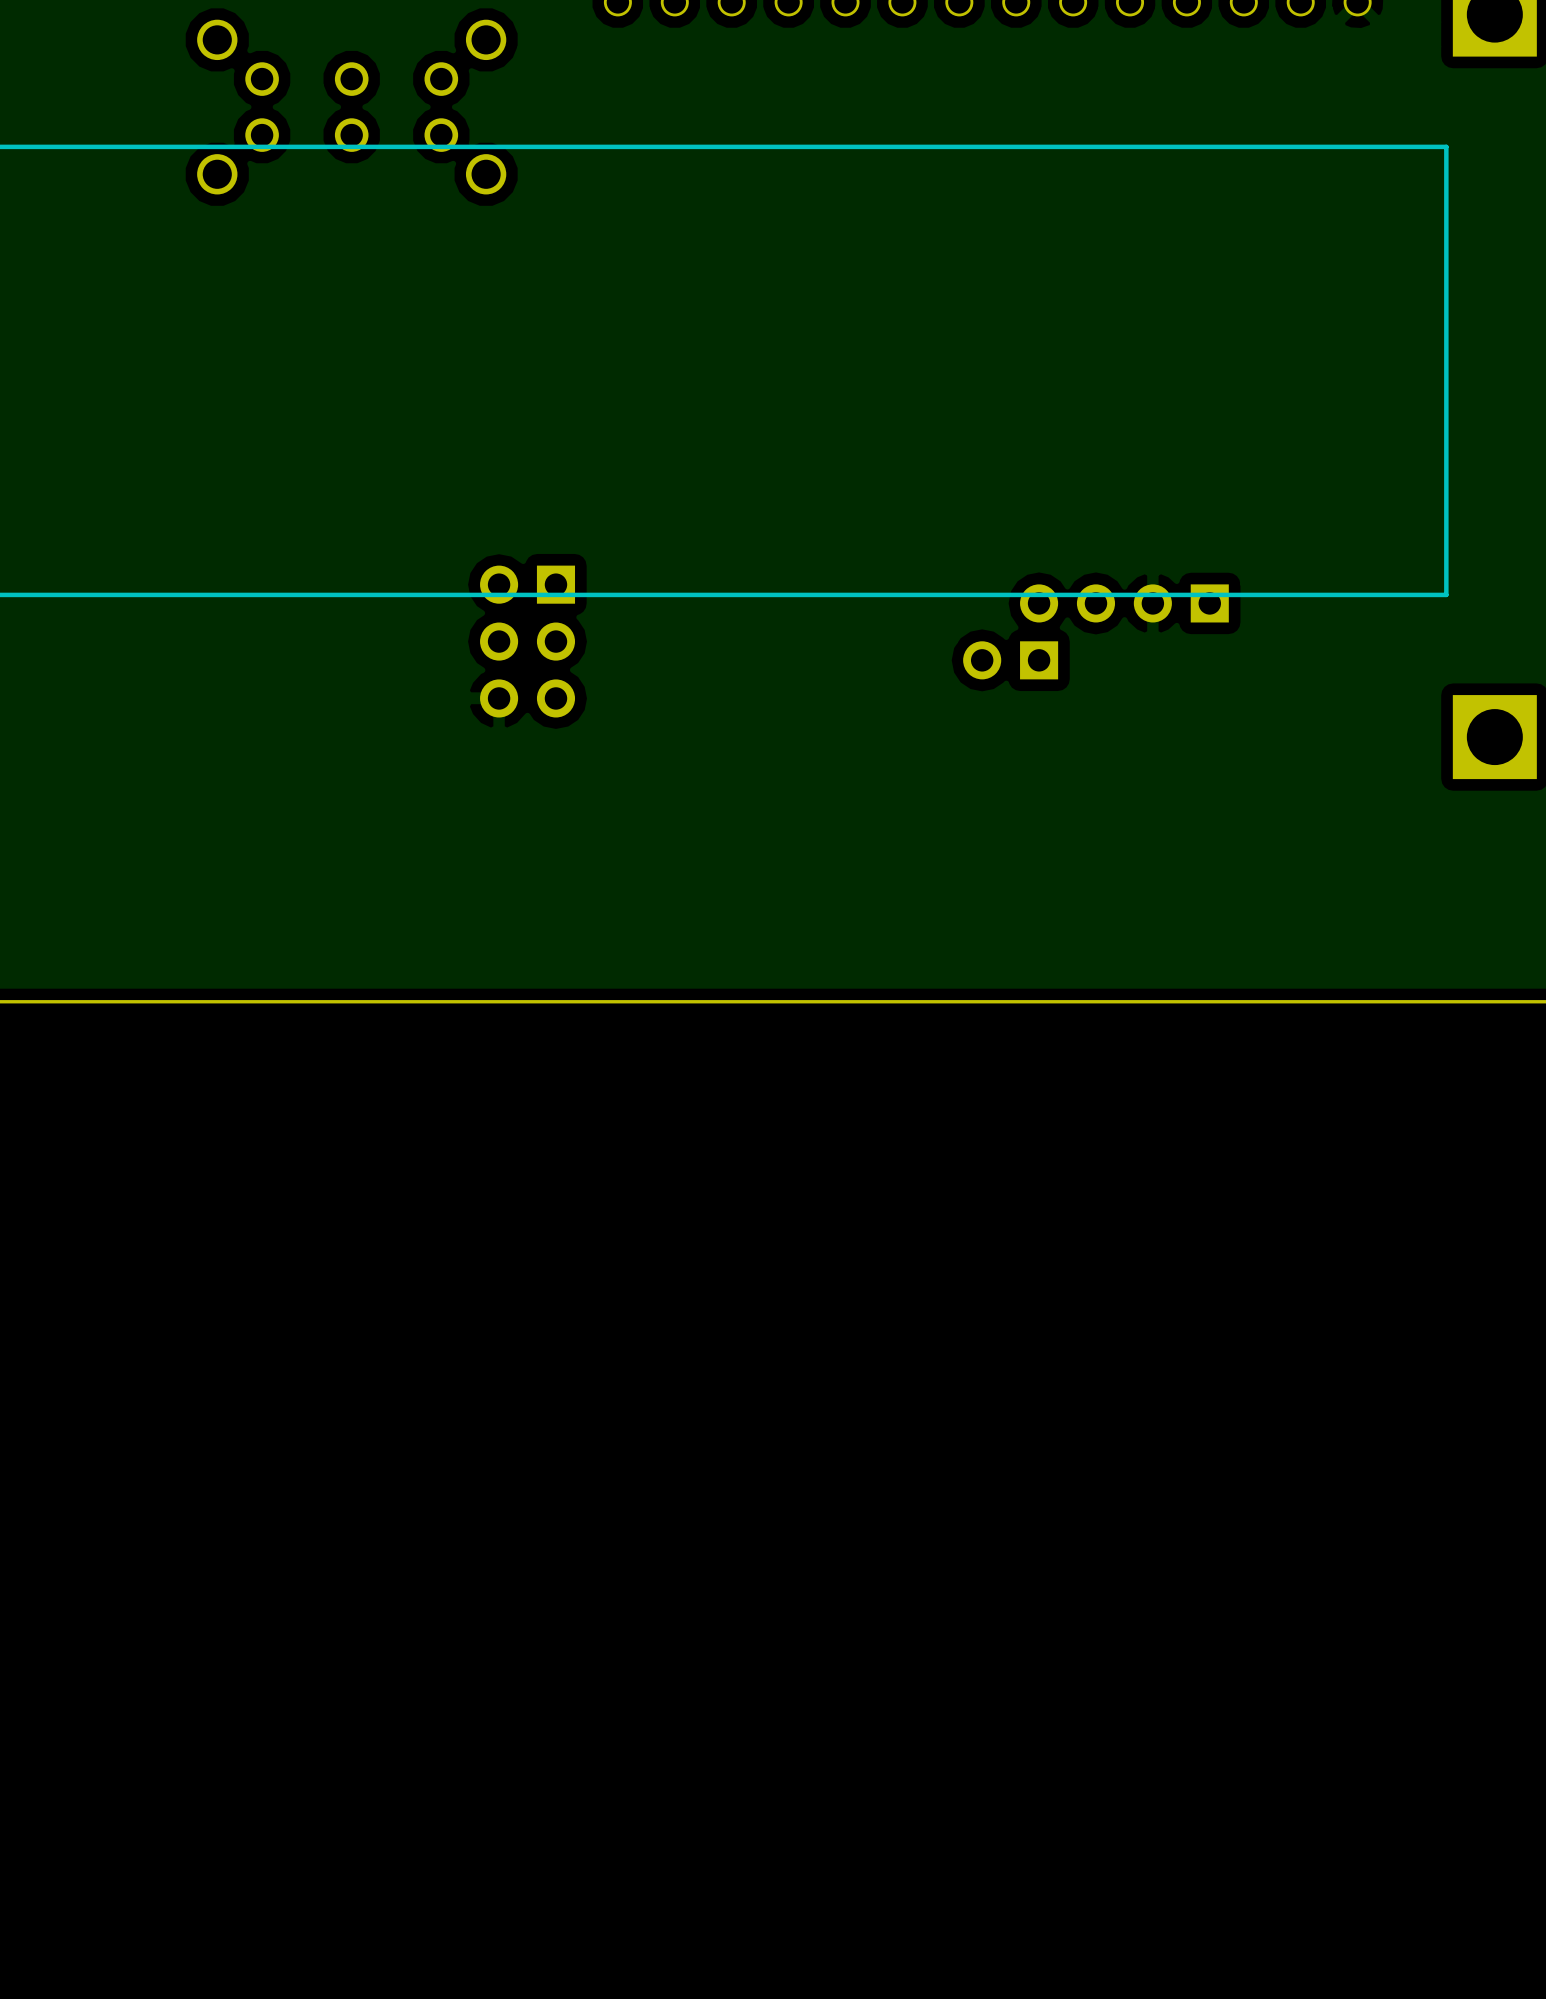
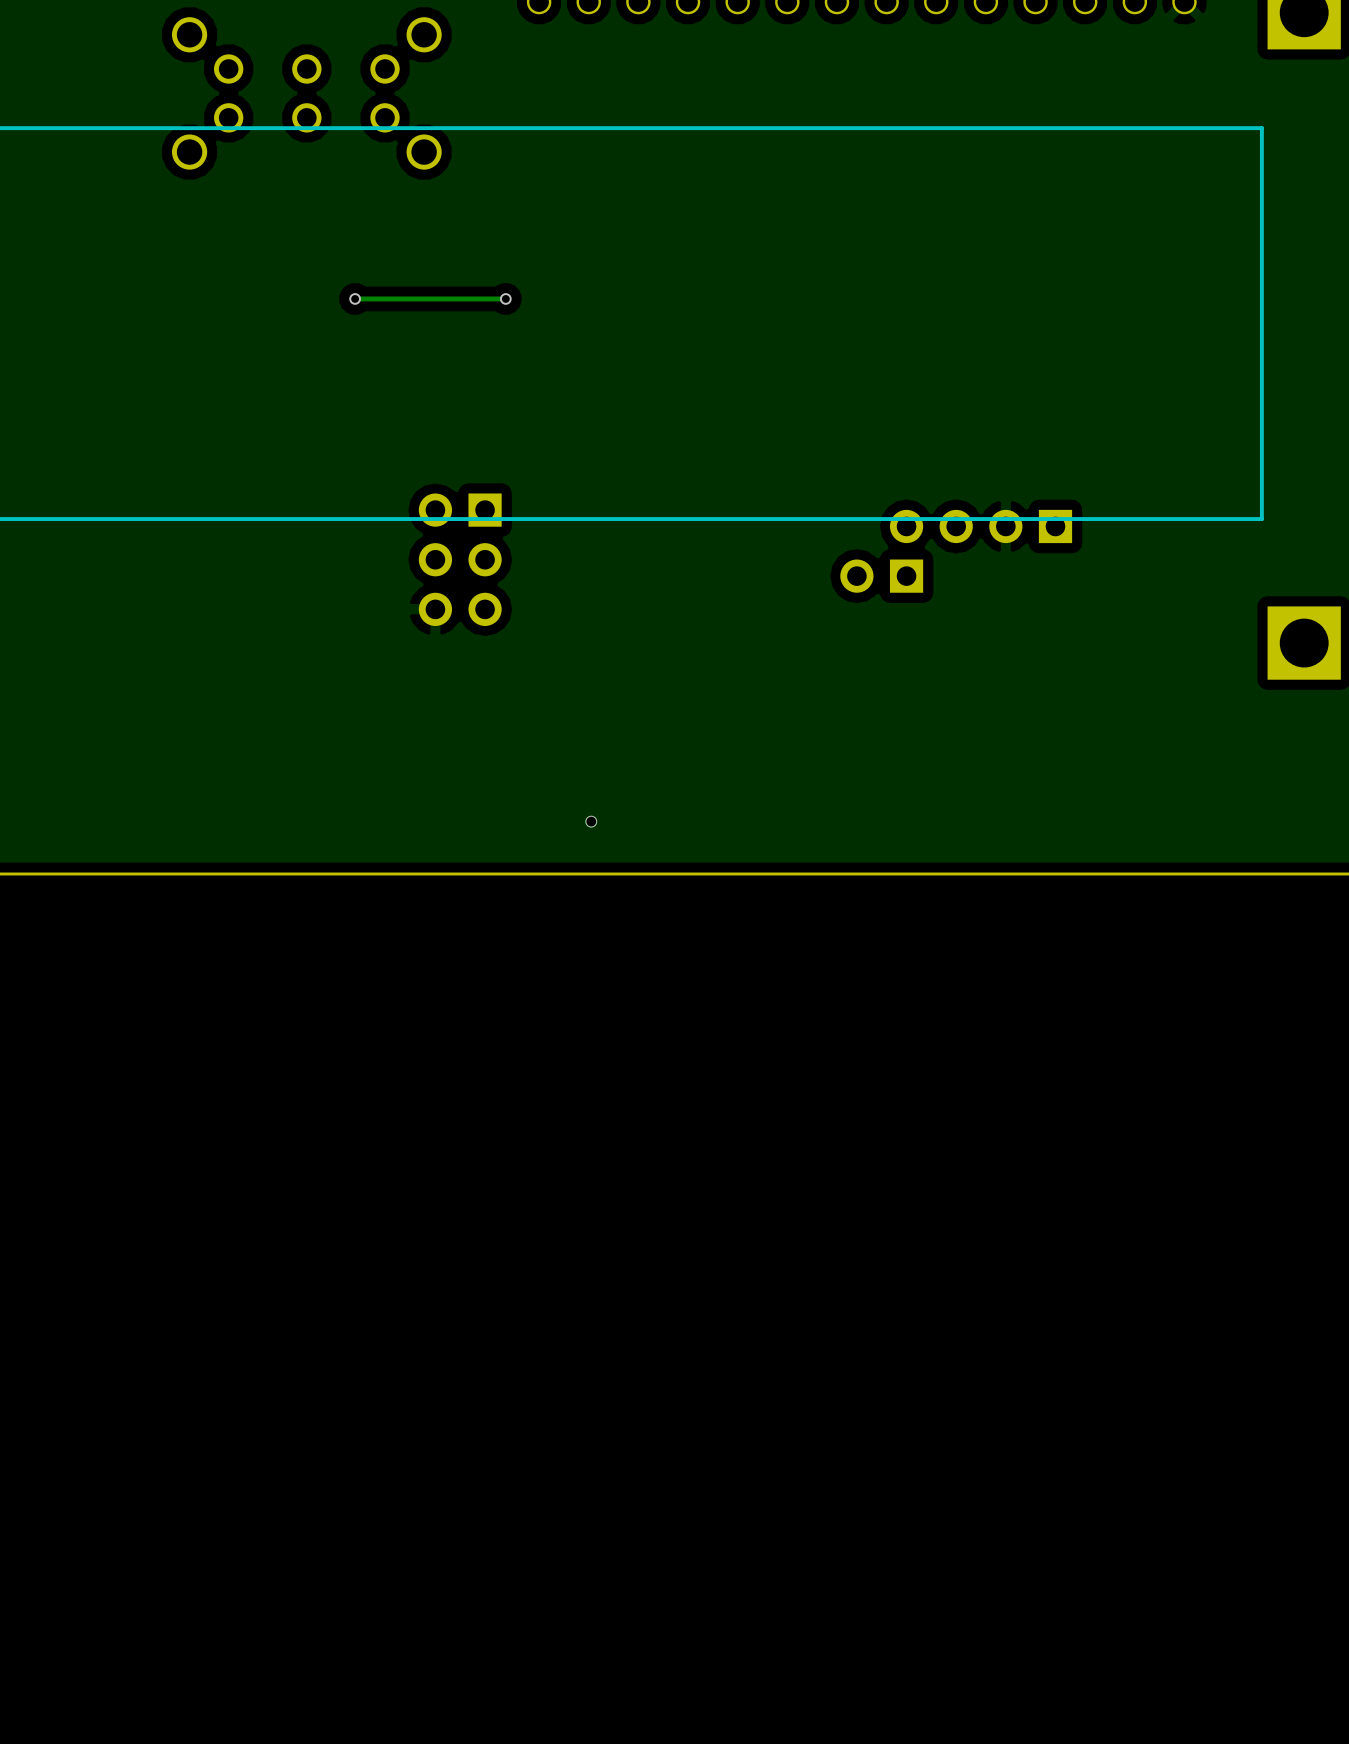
via: none -> (355, 298)
track: none -> (505, 298) (355, 298)
via: none -> (505, 298)
via: none -> (591, 821)

